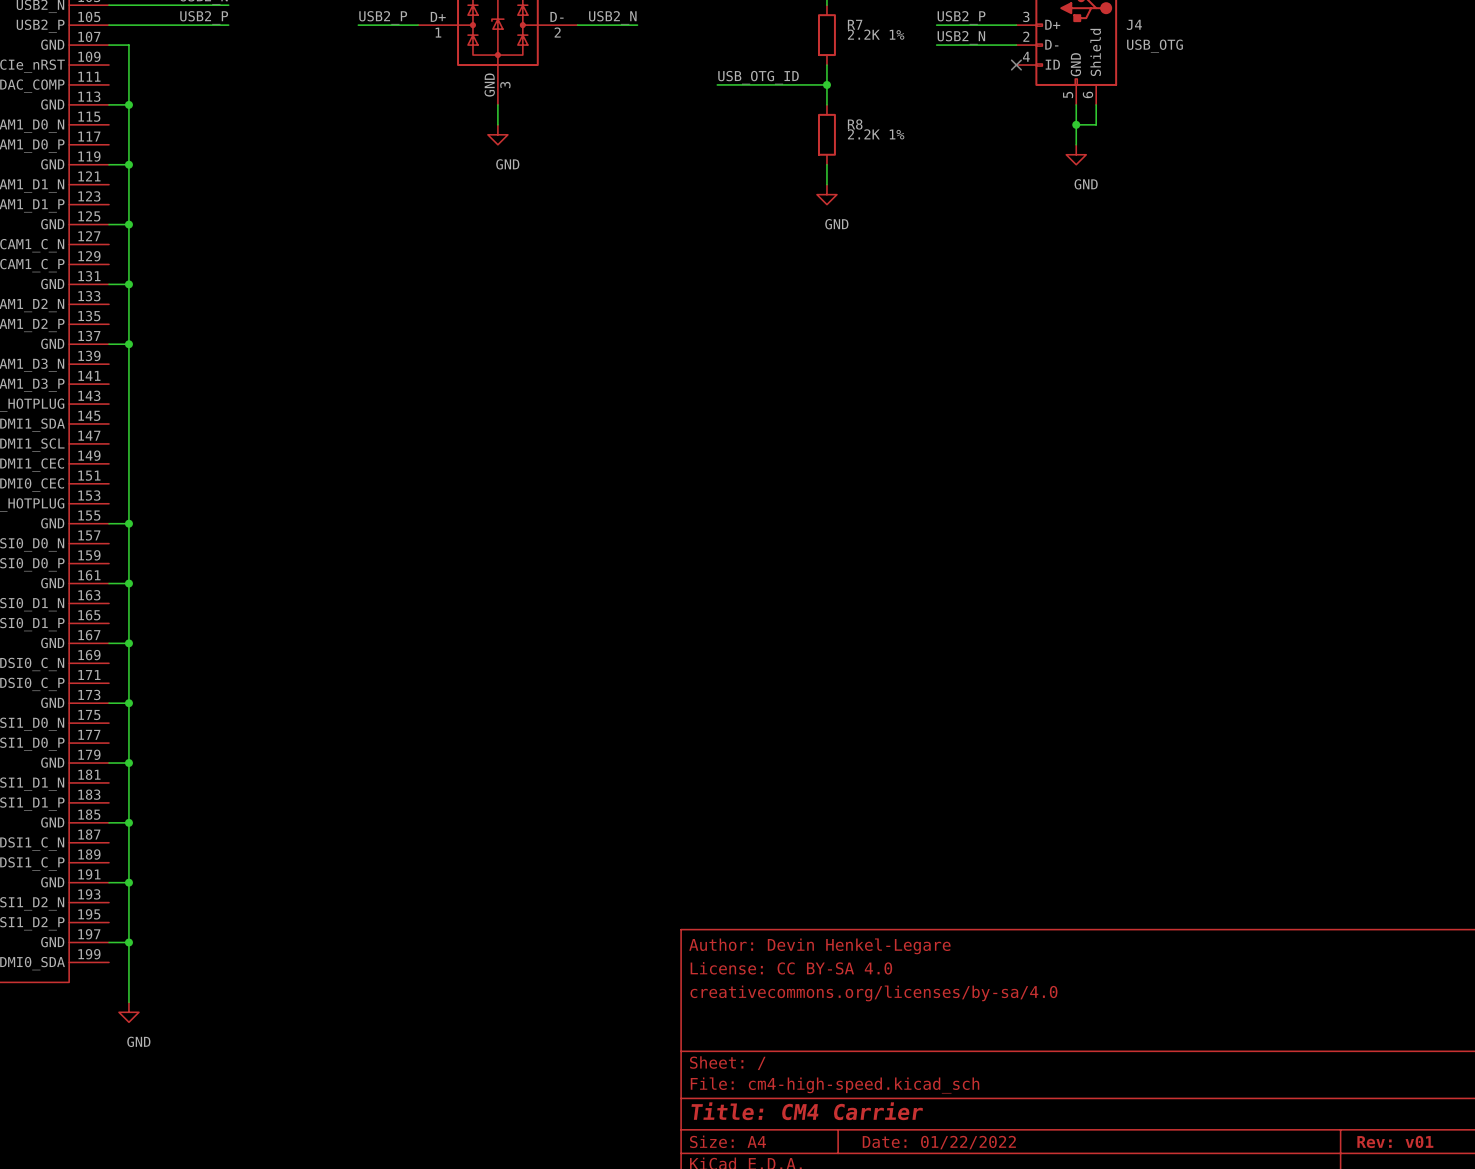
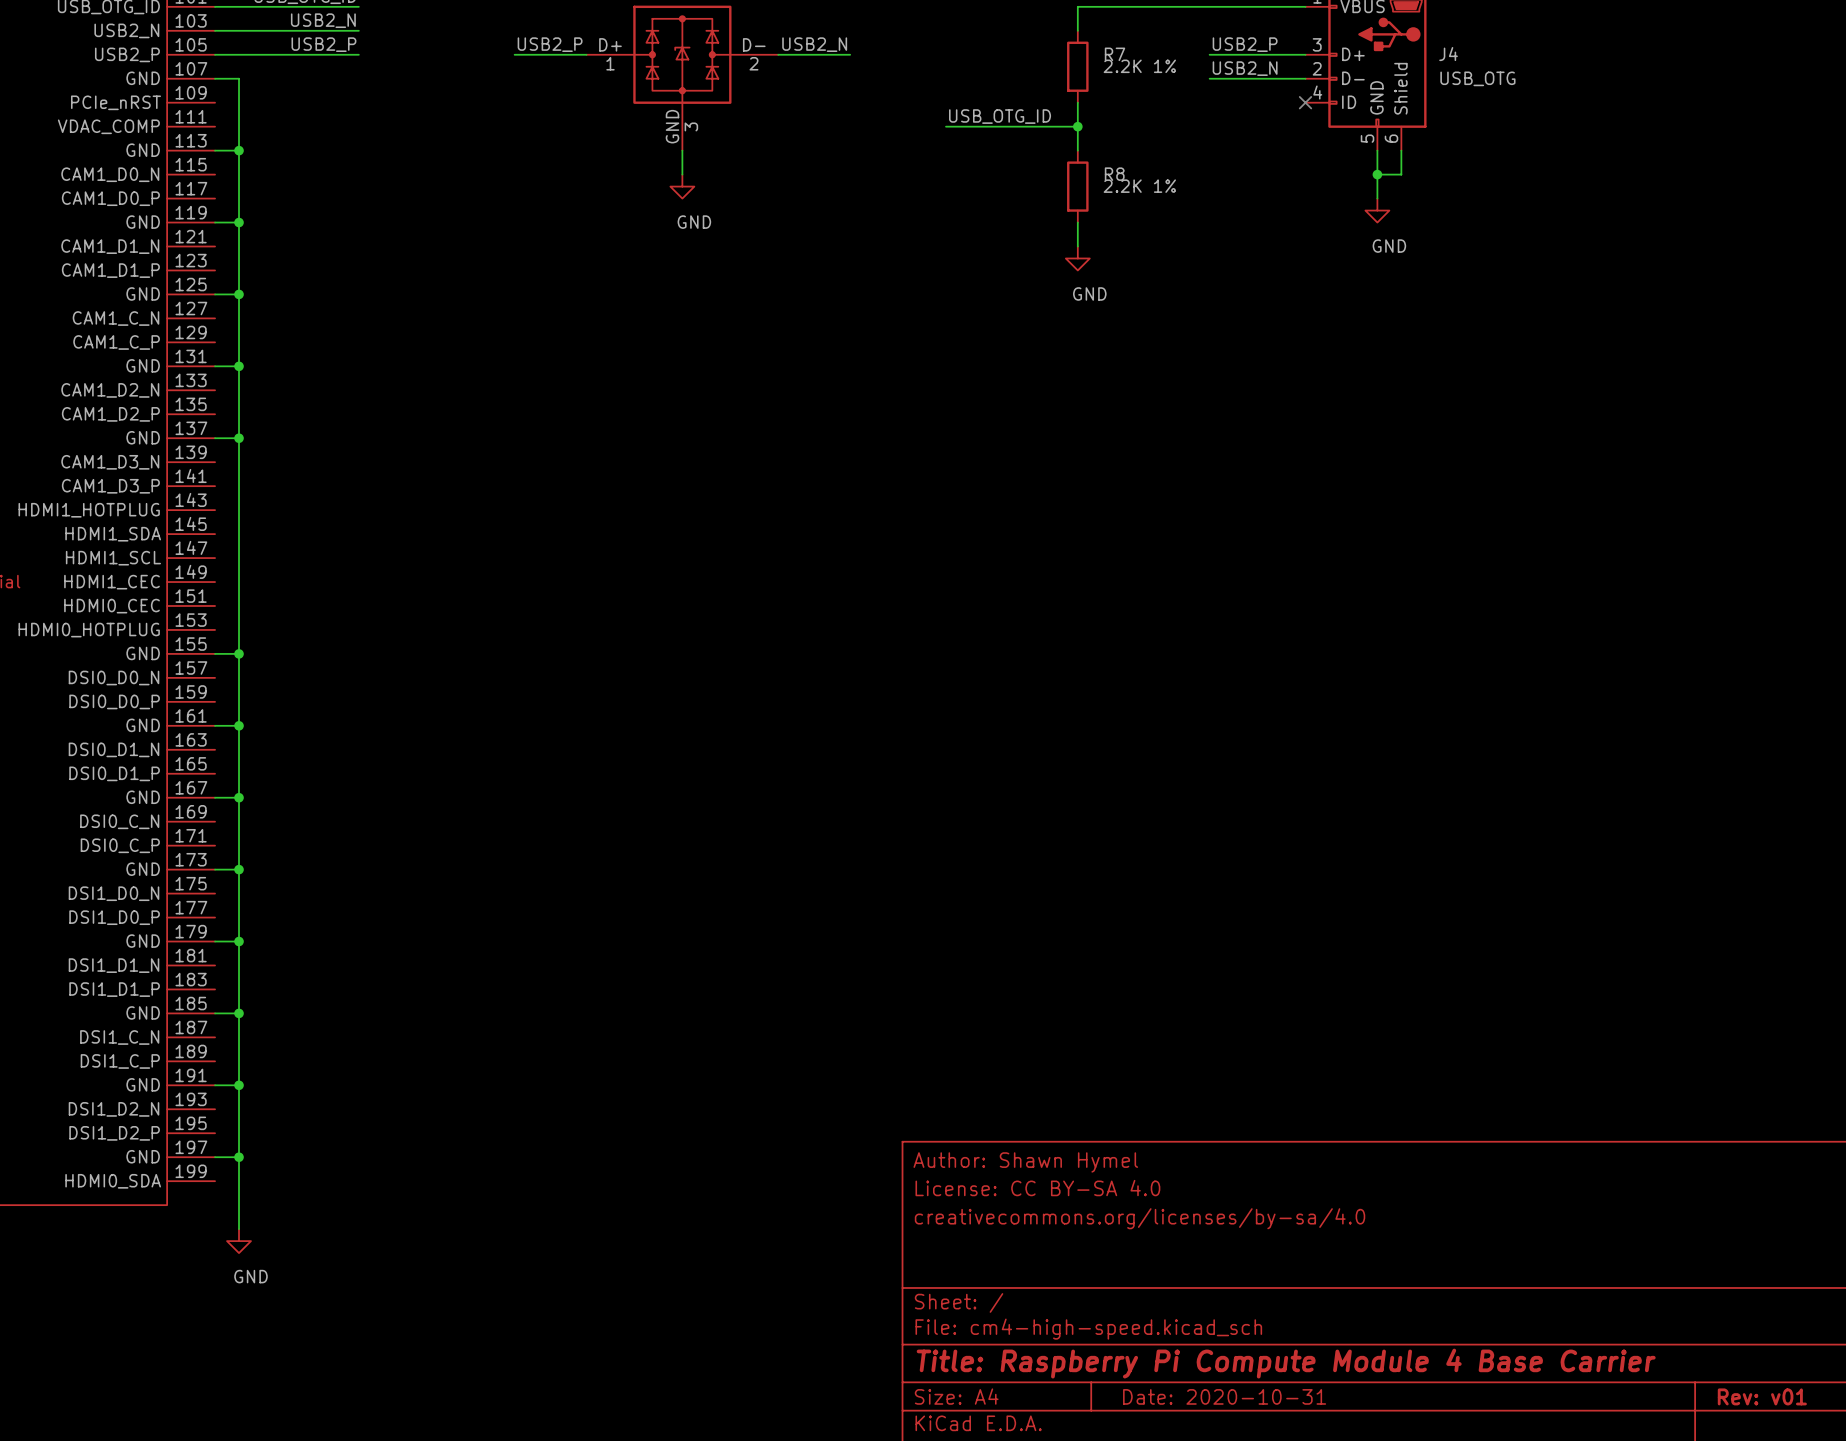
title block: Author: Devin Henkel-Legare (819, 946) -> Author: Shawn Hymel (1025, 1162)
title block: Title: CM4 Carrier (807, 1111) -> Title: Raspberry Pi Compute Module 4 Base Carrier (1286, 1363)
title block: Date: 01/22/2022 (939, 1142) -> Date: 2020-10-31 (1224, 1396)

